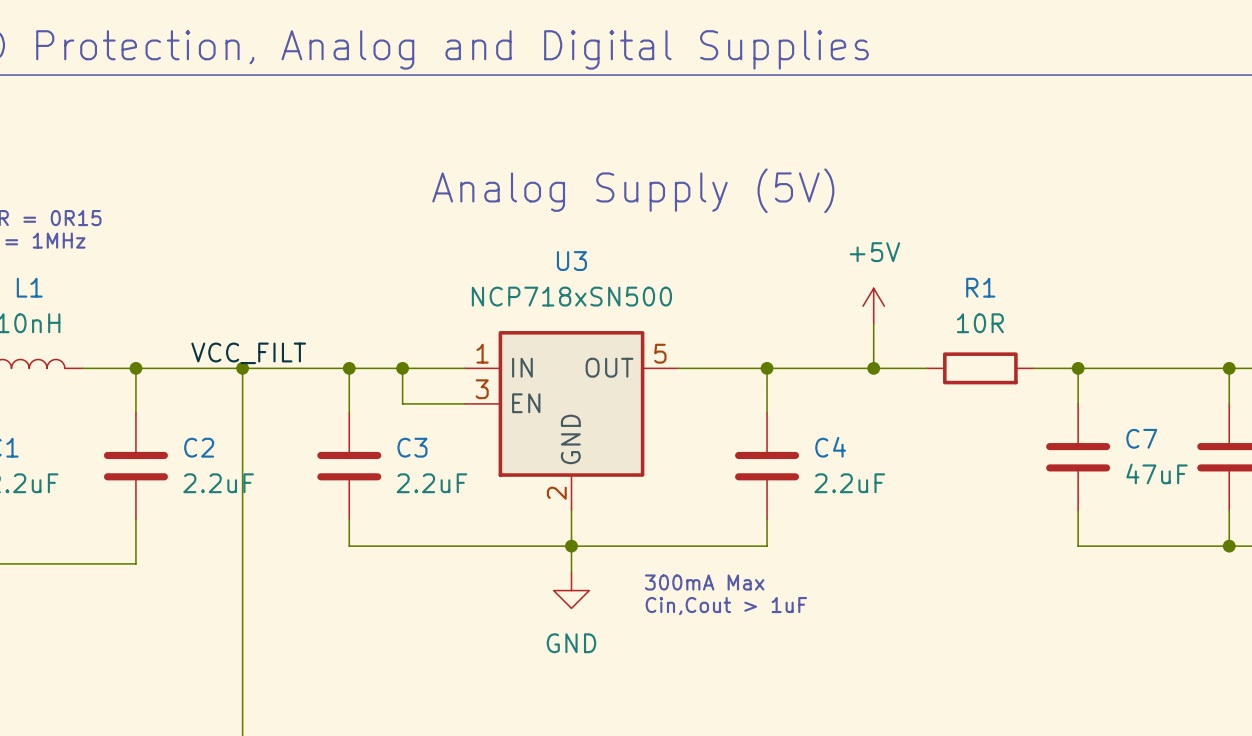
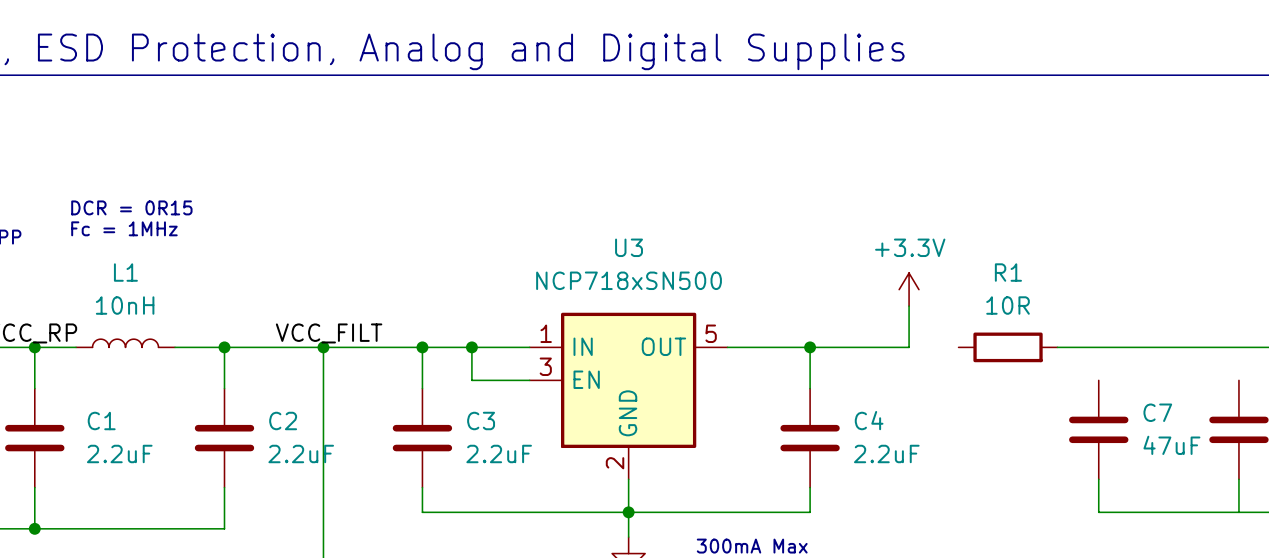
text: Analog Supply (5V) (633, 190) -> none
power symbol: +5V (873, 306) -> +3.3V (909, 289)
wire: (873, 368) (927, 368) -> none
junction: (873, 368) -> none
wire: (1078, 368) (1078, 403) -> none
junction: (1078, 368) -> none
wire: (1229, 368) (1229, 403) -> none
junction: (1229, 368) -> none
junction: (1229, 546) -> none

